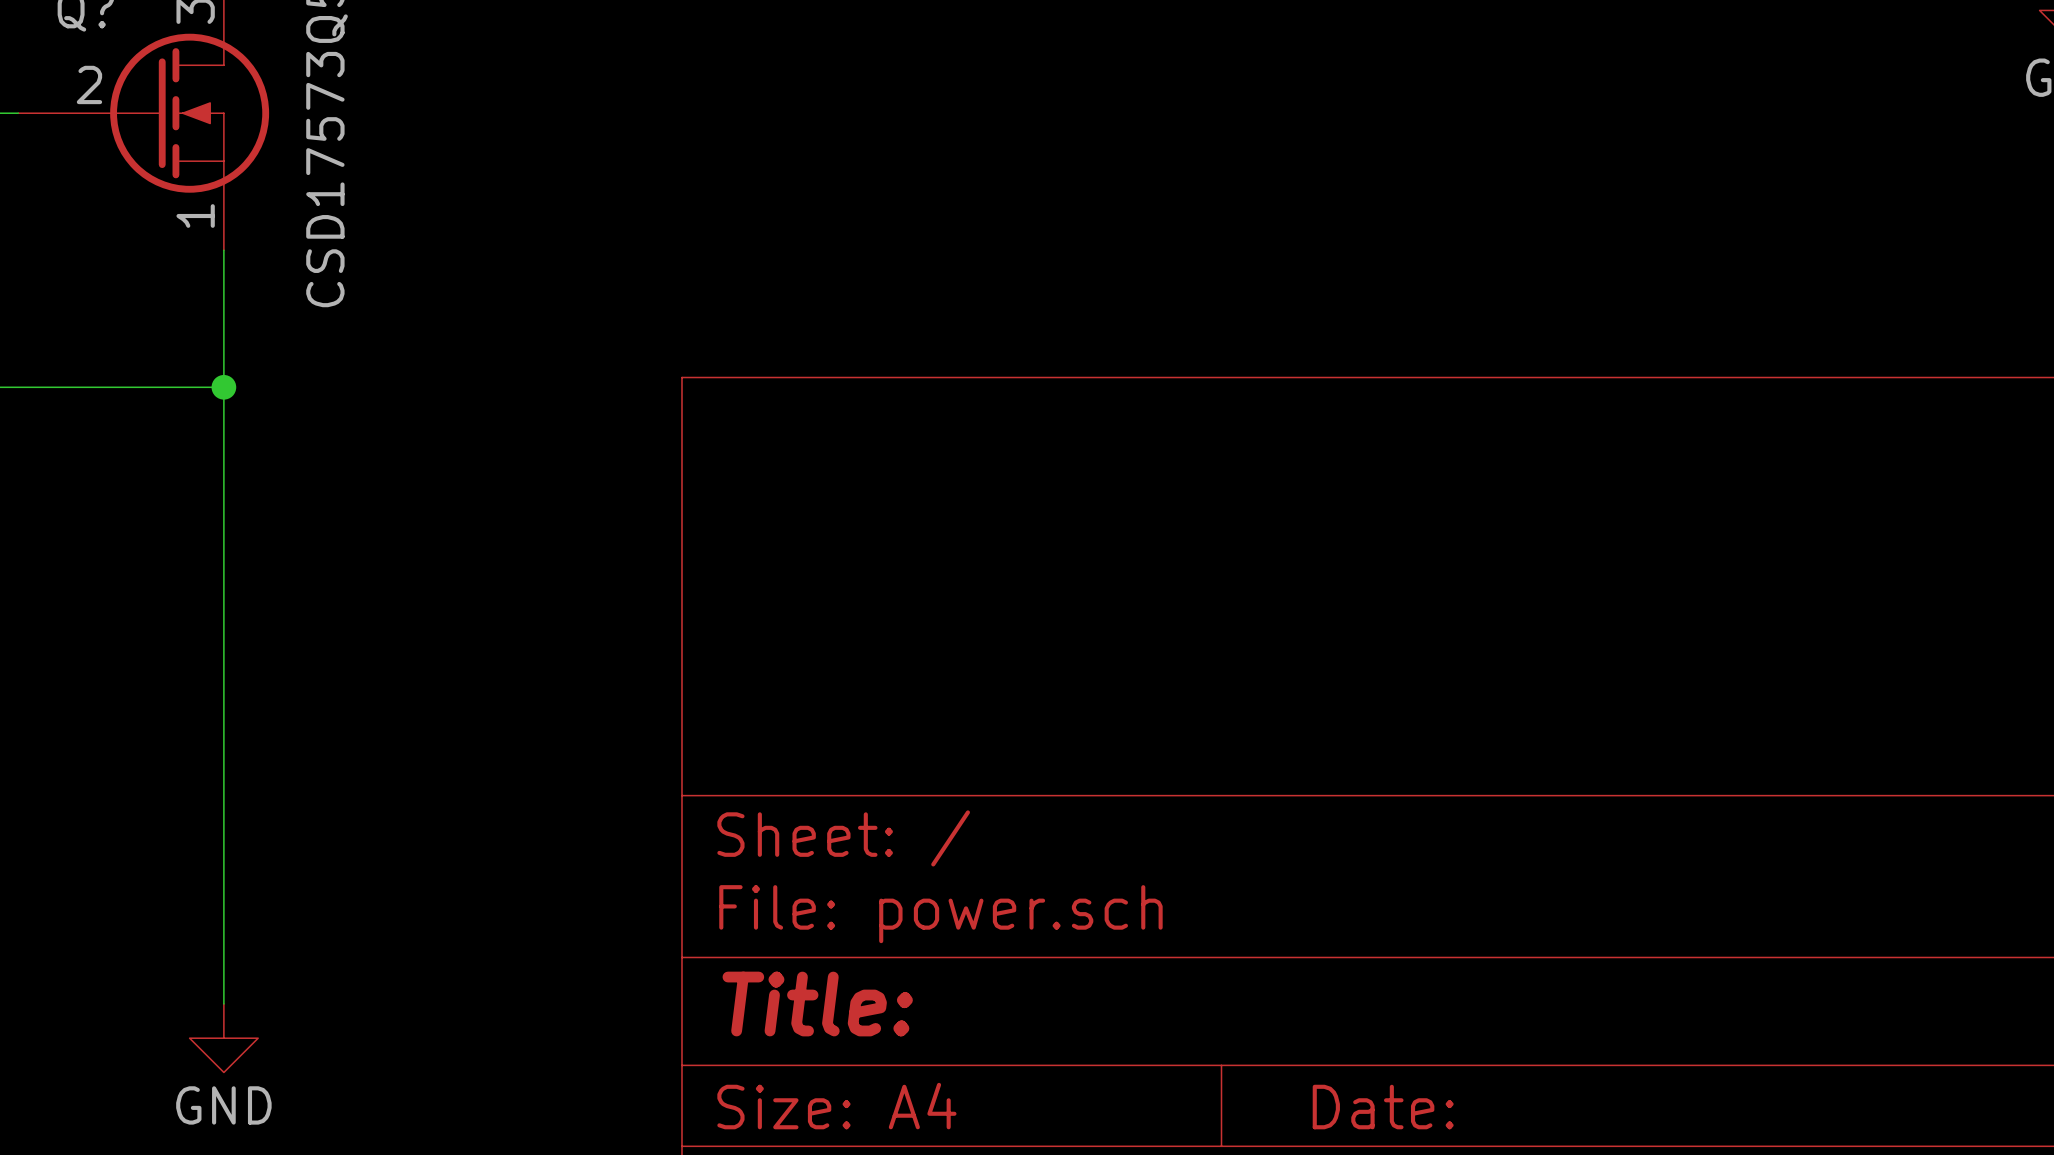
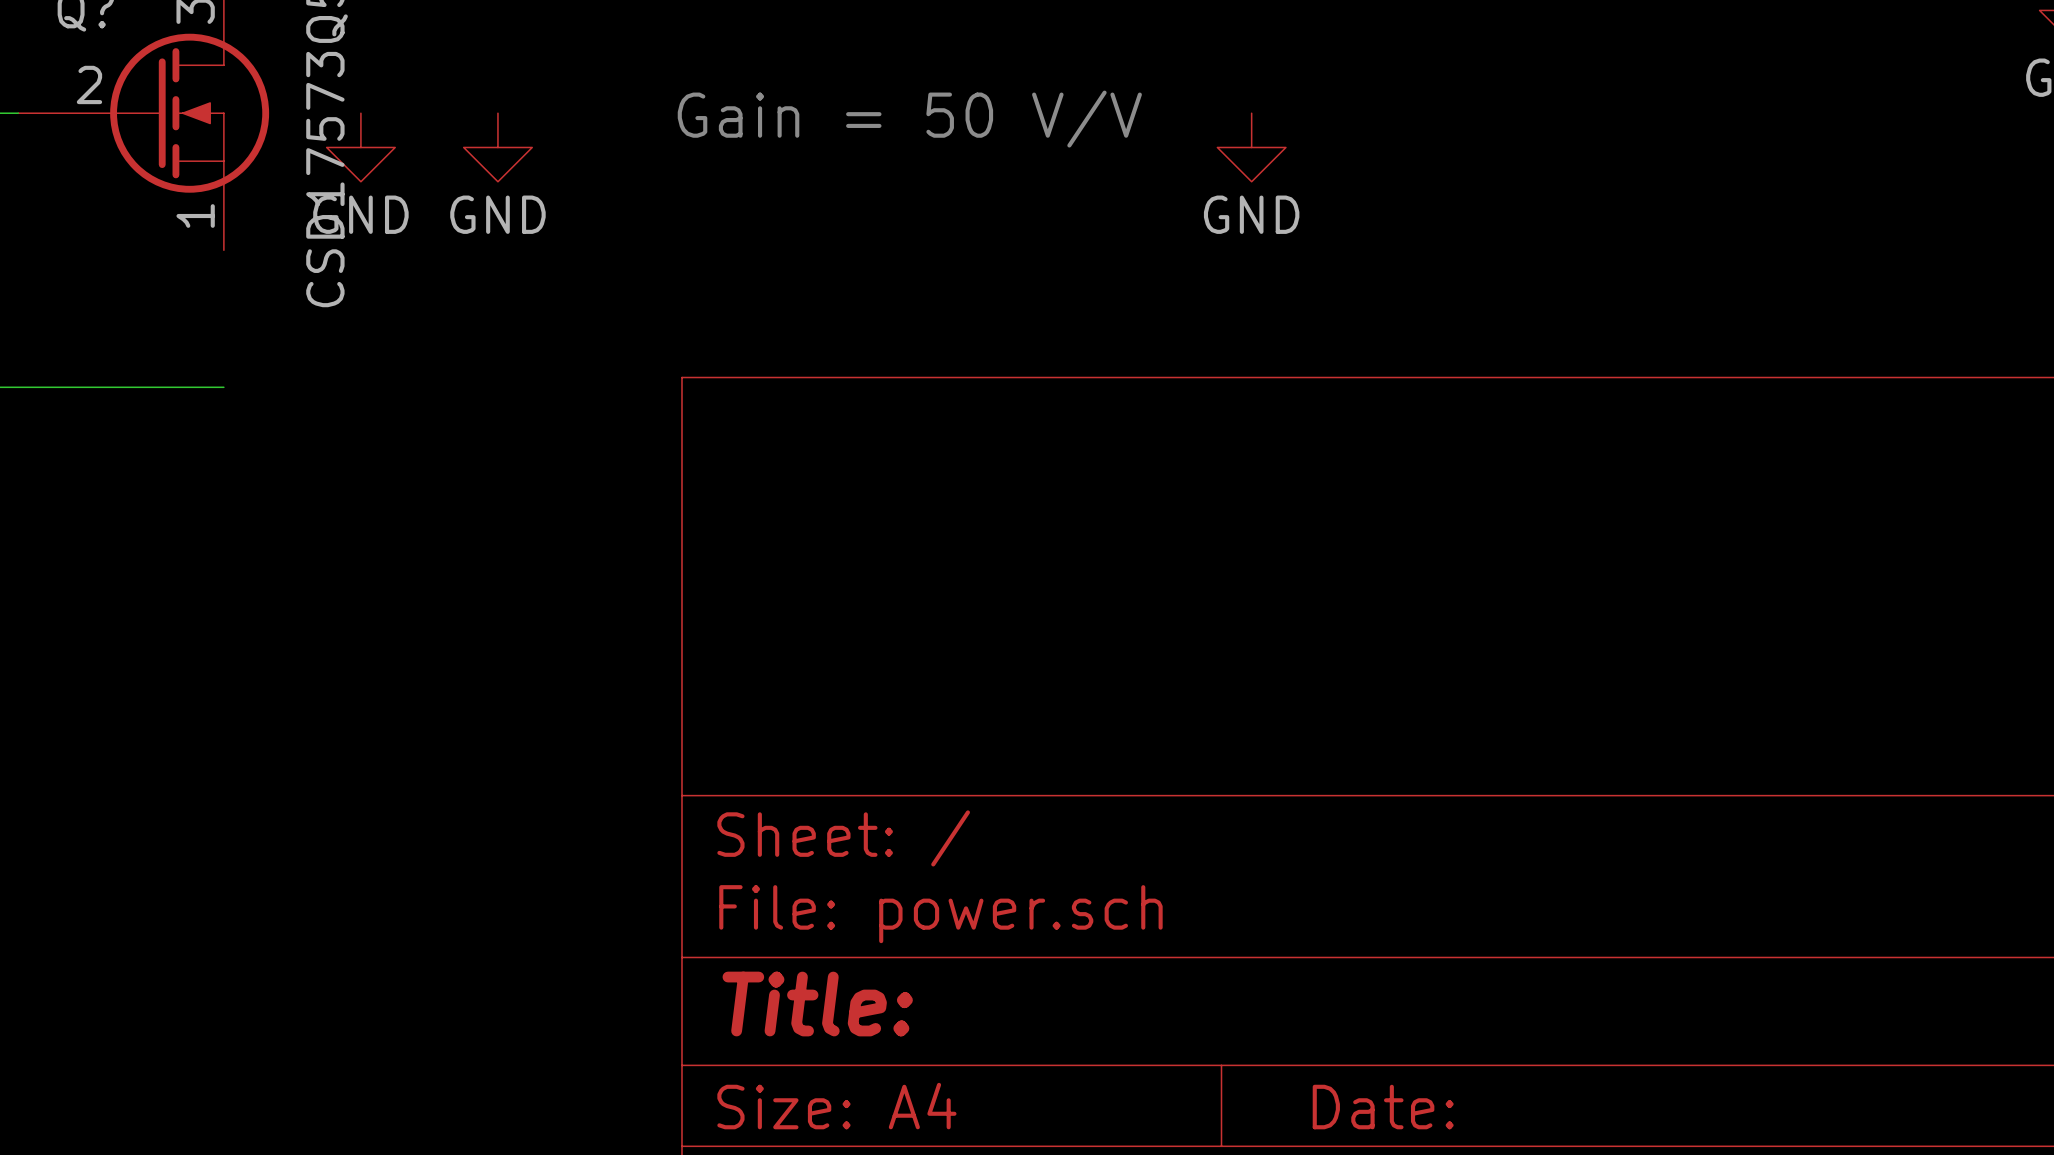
text: none -> Gain = 50 V/V (909, 119)
power symbol: none -> GND (360, 147)
power symbol: none -> GND (497, 147)
power symbol: none -> GND (1251, 147)
wire: (223, 250) (223, 1003) -> none
junction: (223, 387) -> none
power symbol: GND (223, 1038) -> none

